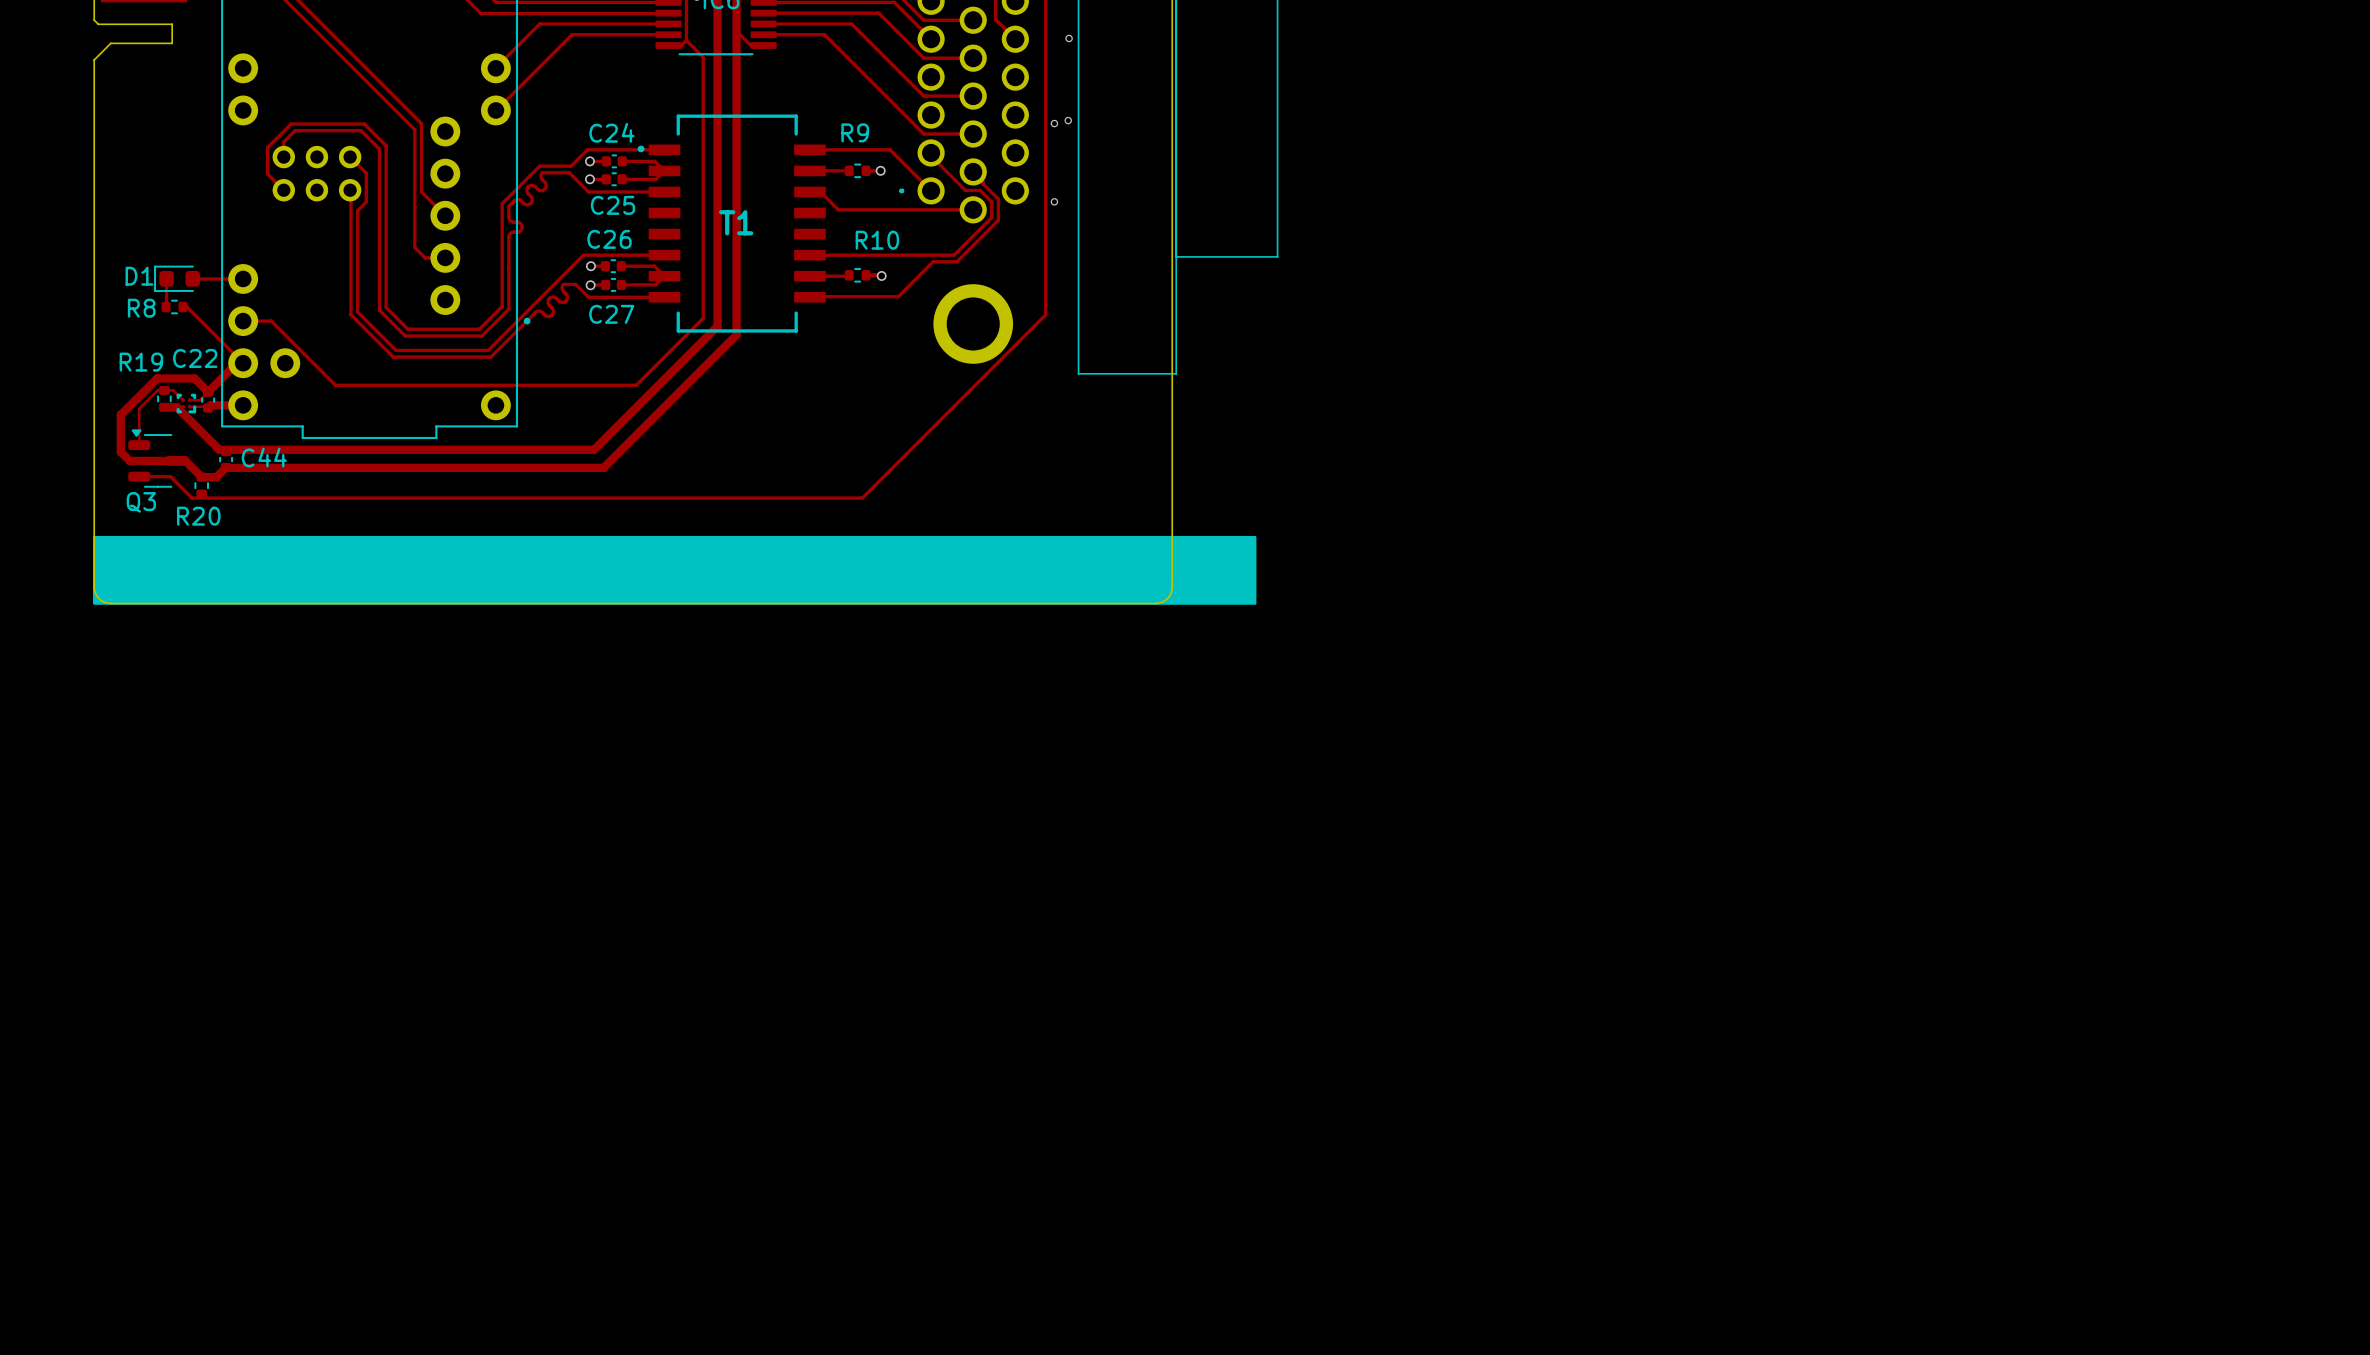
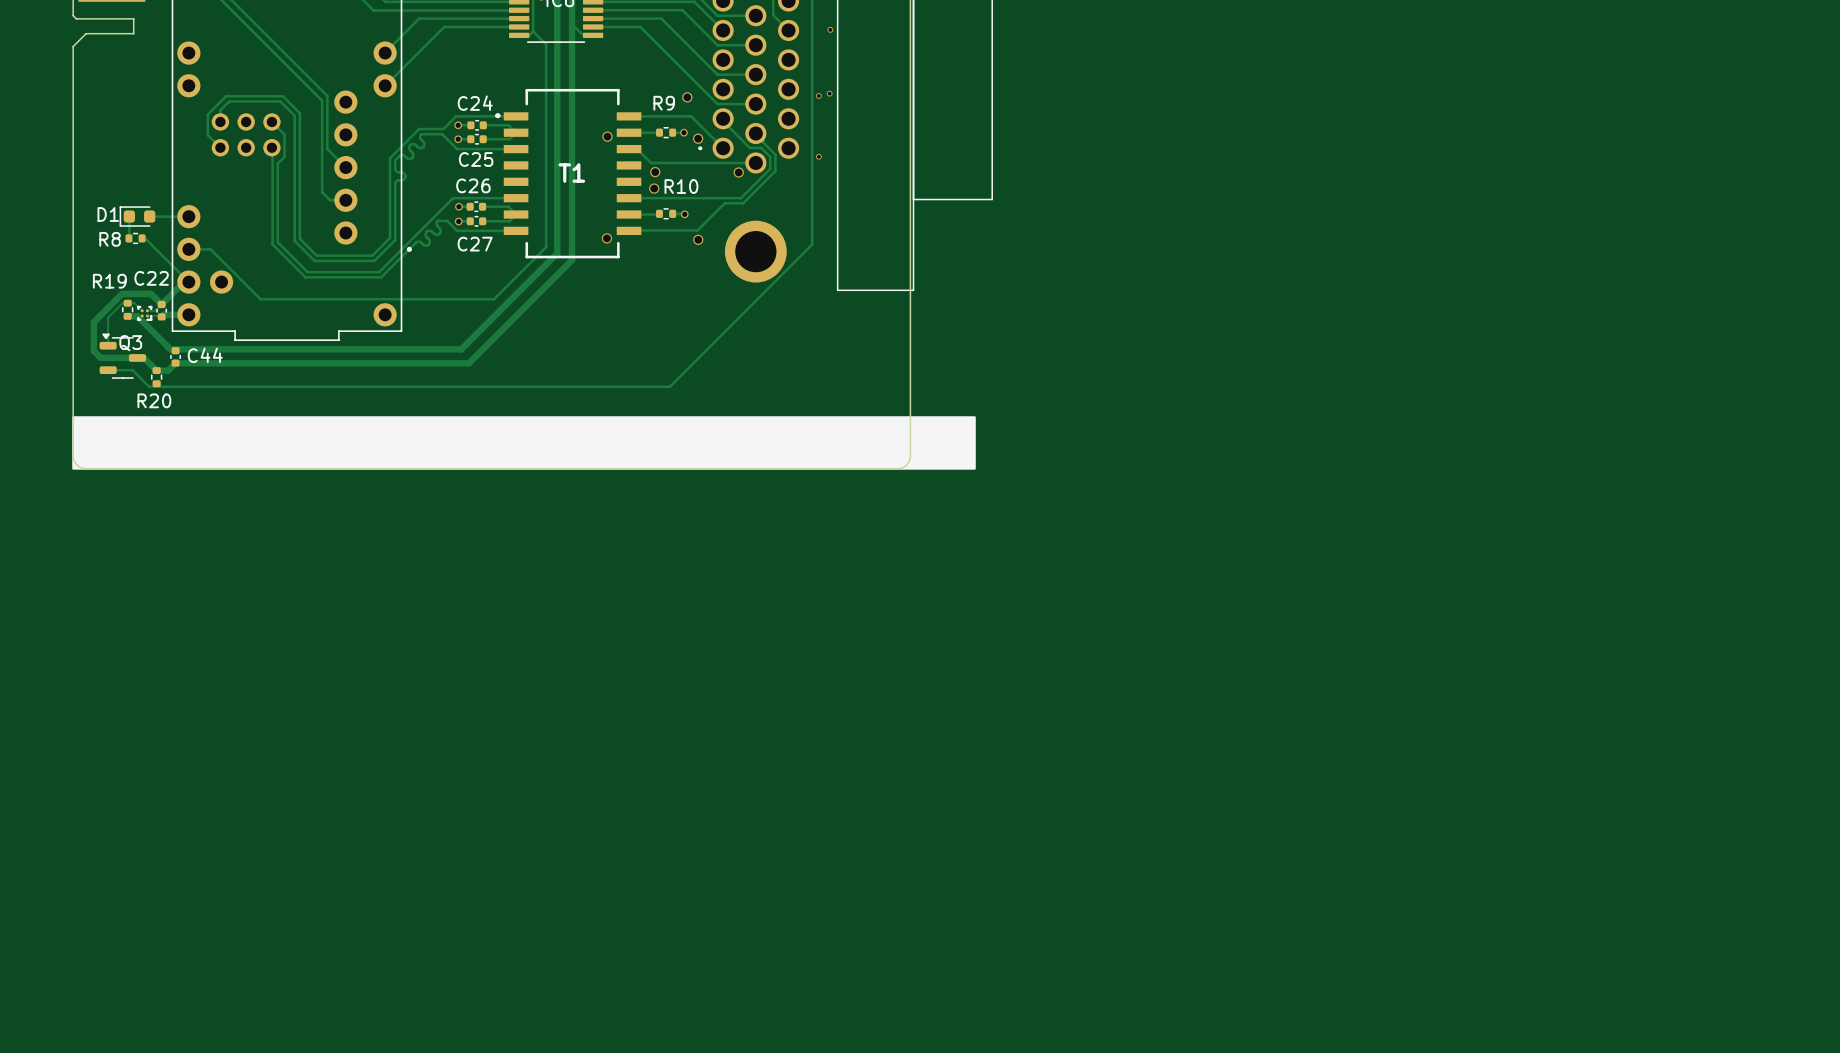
via: none -> (687, 97)
via: none -> (607, 136)
via: none -> (698, 138)
via: none -> (655, 172)
via: none -> (738, 172)
via: none -> (654, 188)
via: none -> (606, 238)
via: none -> (698, 239)
Q3 name position: Q3 (141, 502) -> Q3 (130, 343)

